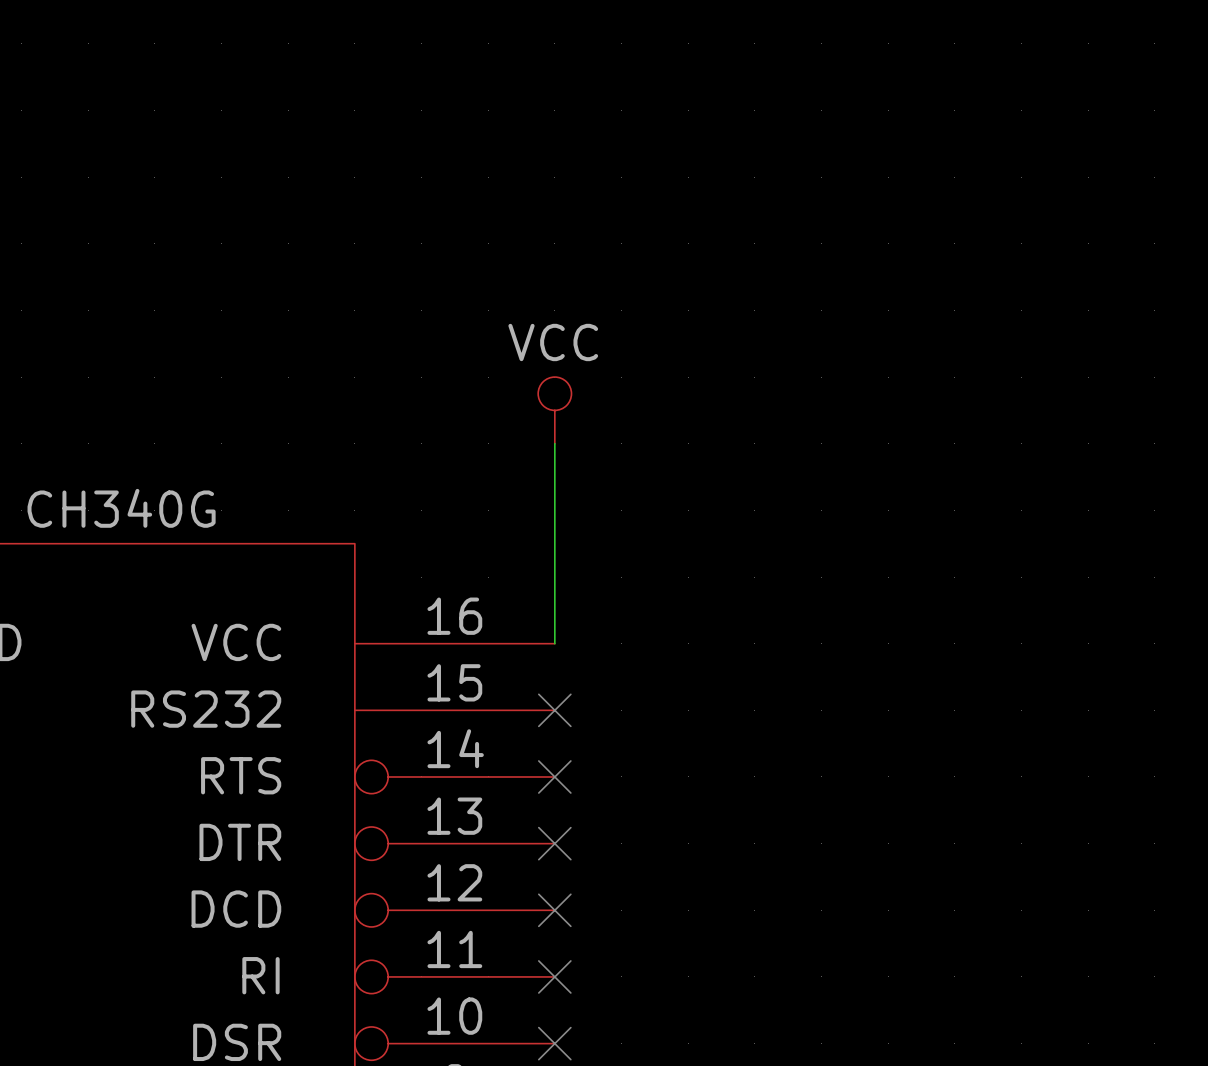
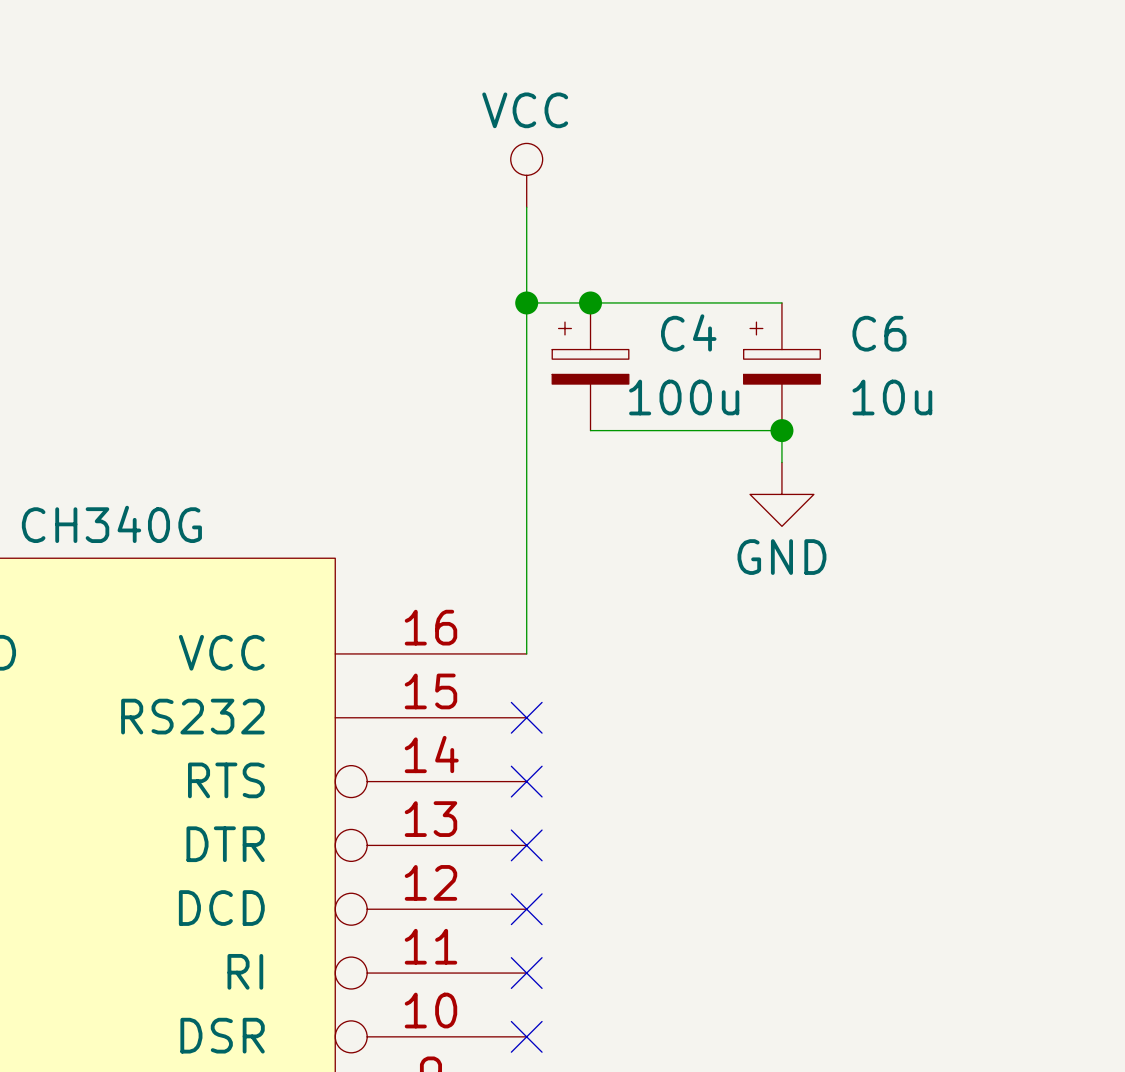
wire: none -> (526, 207) (526, 462)
wire: none -> (526, 302) (781, 302)
junction: none -> (526, 302)
junction: none -> (590, 302)
C4: none -> 100u (590, 366)
C6: none -> 10u (781, 366)
power symbol position: VCC (554, 410) -> VCC (526, 175)
wire: none -> (590, 430) (781, 430) (781, 462)
junction: none -> (781, 430)
power symbol: none -> GND (781, 494)

